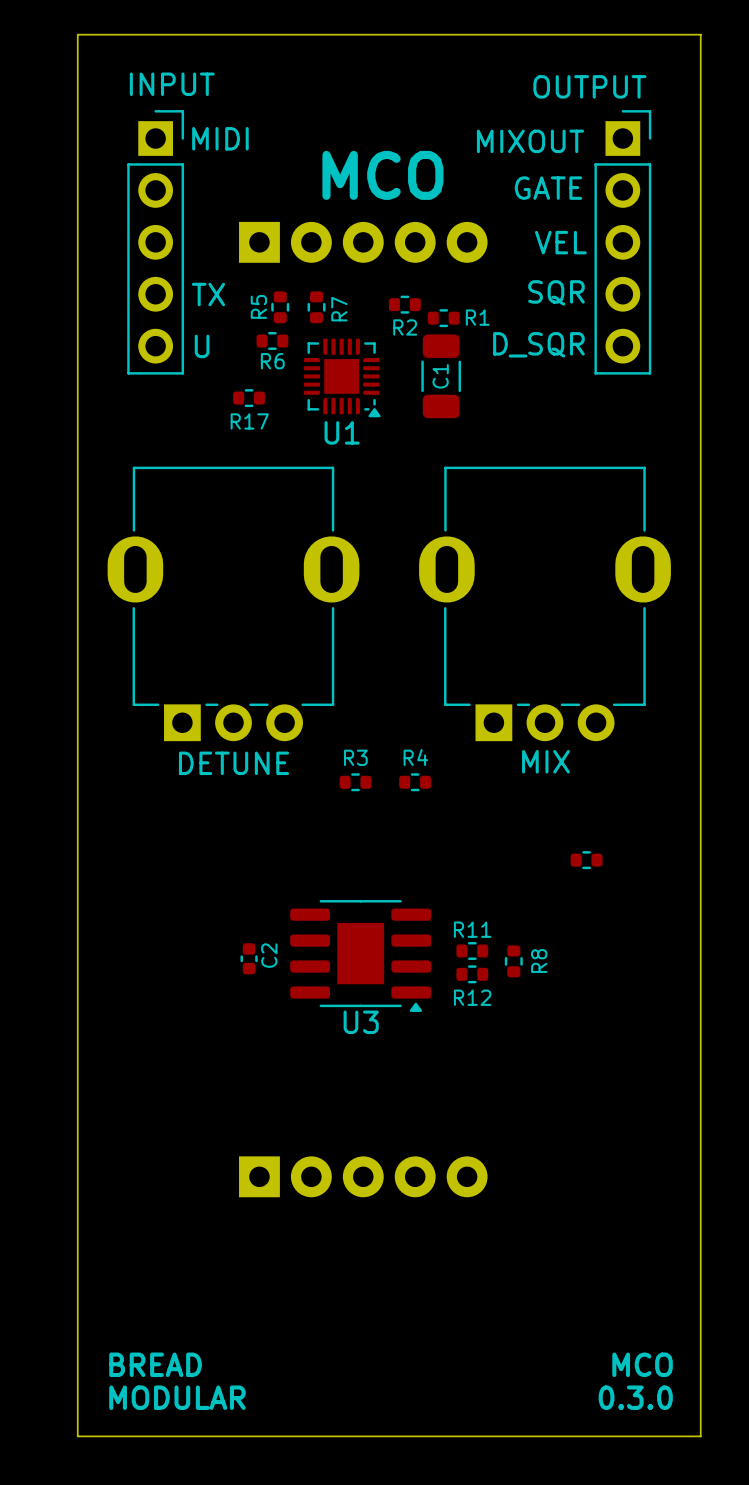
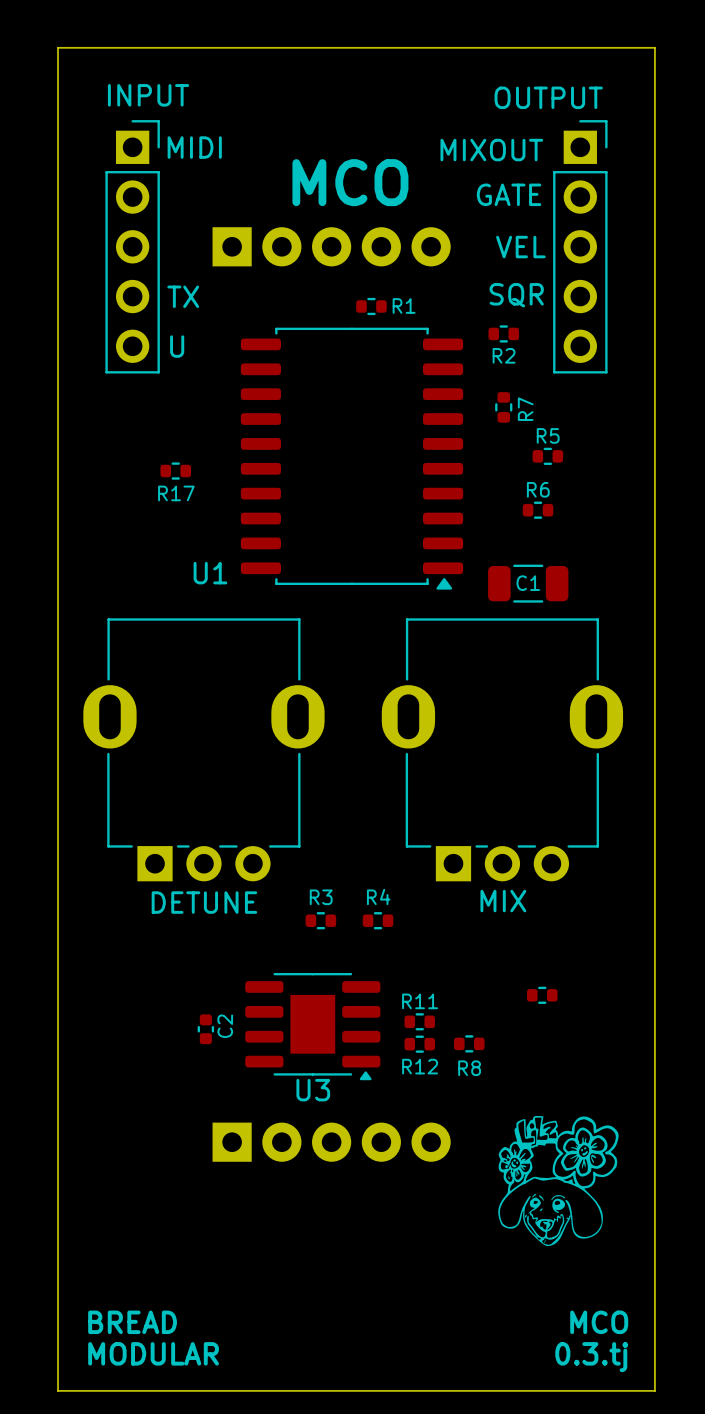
R5 rotation: 0° (280, 307) -> 90° clockwise (547, 456)
R5 position: (280, 307) -> (547, 456)
R7 position: (316, 307) -> (503, 407)
R1: (443, 318) -> none
R2 name: R2 (405, 327) -> R1 (404, 305)
R2: none -> (503, 333)
U1 footprint: [303, 338, 381, 418] -> [240, 327, 464, 590]
R6 position: (272, 340) -> (538, 510)
text: D_SQR (538, 344) -> none
R6 name position: R6 (272, 361) -> R6 (538, 489)
C1 rotation: 0° (441, 376) -> 90° clockwise (528, 583)
C1 position: (441, 376) -> (528, 583)
R17 position: (249, 398) -> (175, 471)
U1 name position: U1 (342, 432) -> U1 (210, 573)
part position: (233, 603) -> (203, 749)
part position: (544, 603) -> (502, 749)
text position: MIX (545, 761) -> MIX (503, 901)
text position: DETUNE (233, 763) -> DETUNE (204, 902)
R3 position: (355, 782) -> (320, 920)
R4 position: (415, 782) -> (378, 920)
part position: (586, 860) -> (542, 995)
R11 position: (472, 950) -> (419, 1021)
U3 position: (360, 955) -> (312, 1026)
C2 position: (249, 958) -> (205, 1029)
R8 rotation: 0° (513, 961) -> 90° clockwise (469, 1043)
R8 position: (513, 961) -> (469, 1043)
R12 position: (472, 974) -> (419, 1044)
drawing: none -> [498, 1115, 619, 1247]
text: 0.3.0 (635, 1397) -> 0.3.tj (591, 1357)

